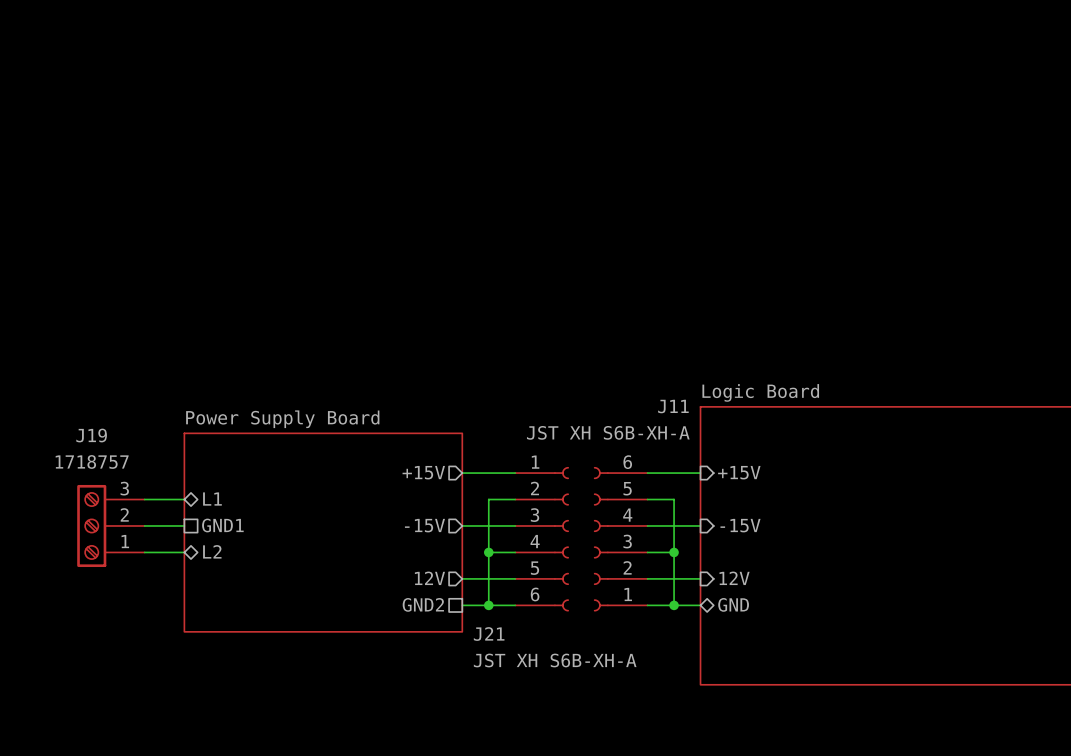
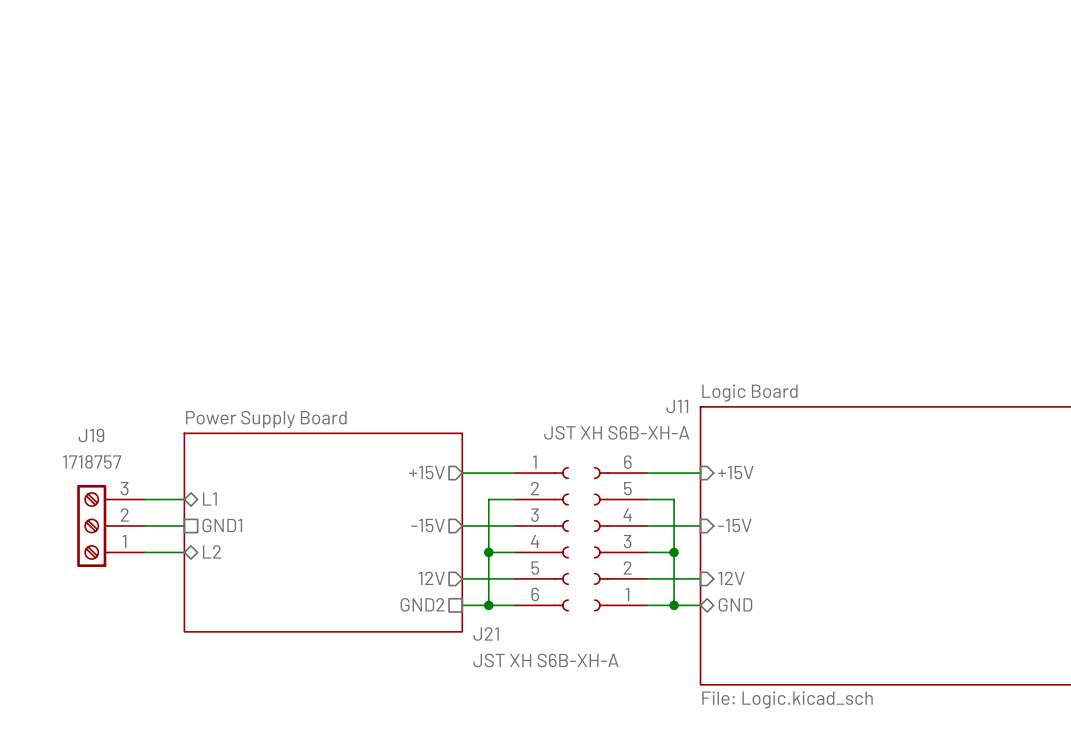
sheet Logic Board value: none -> File: Logic.kicad_sch (787, 699)

